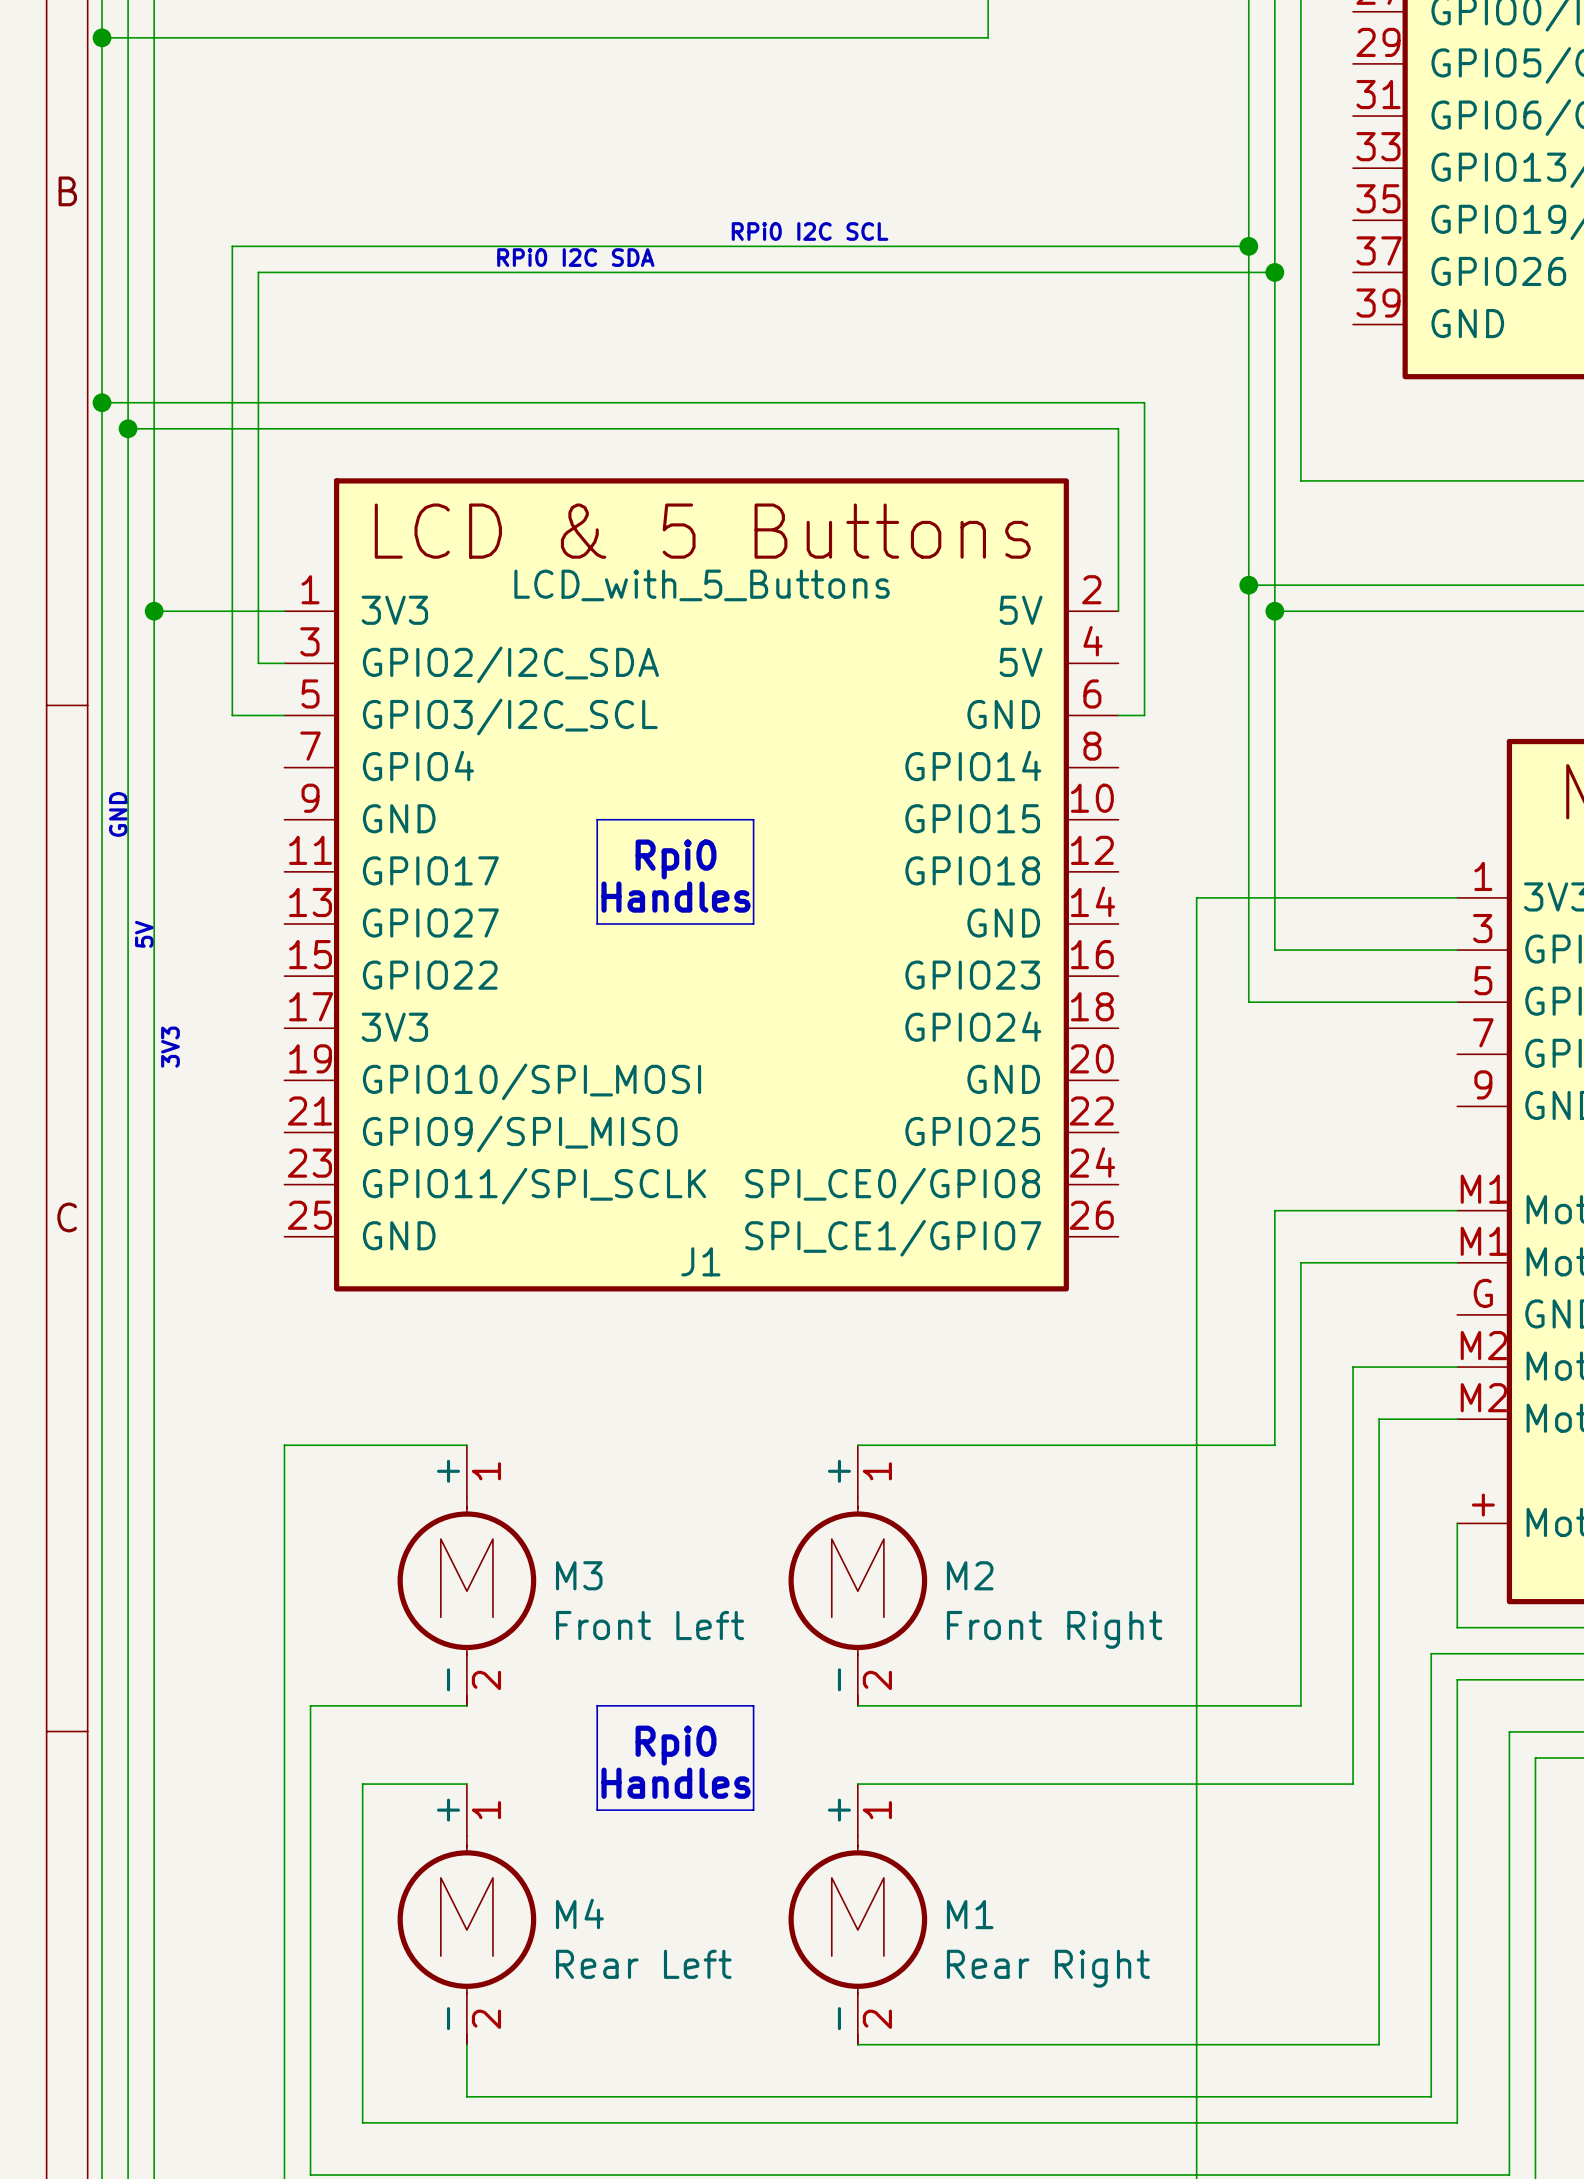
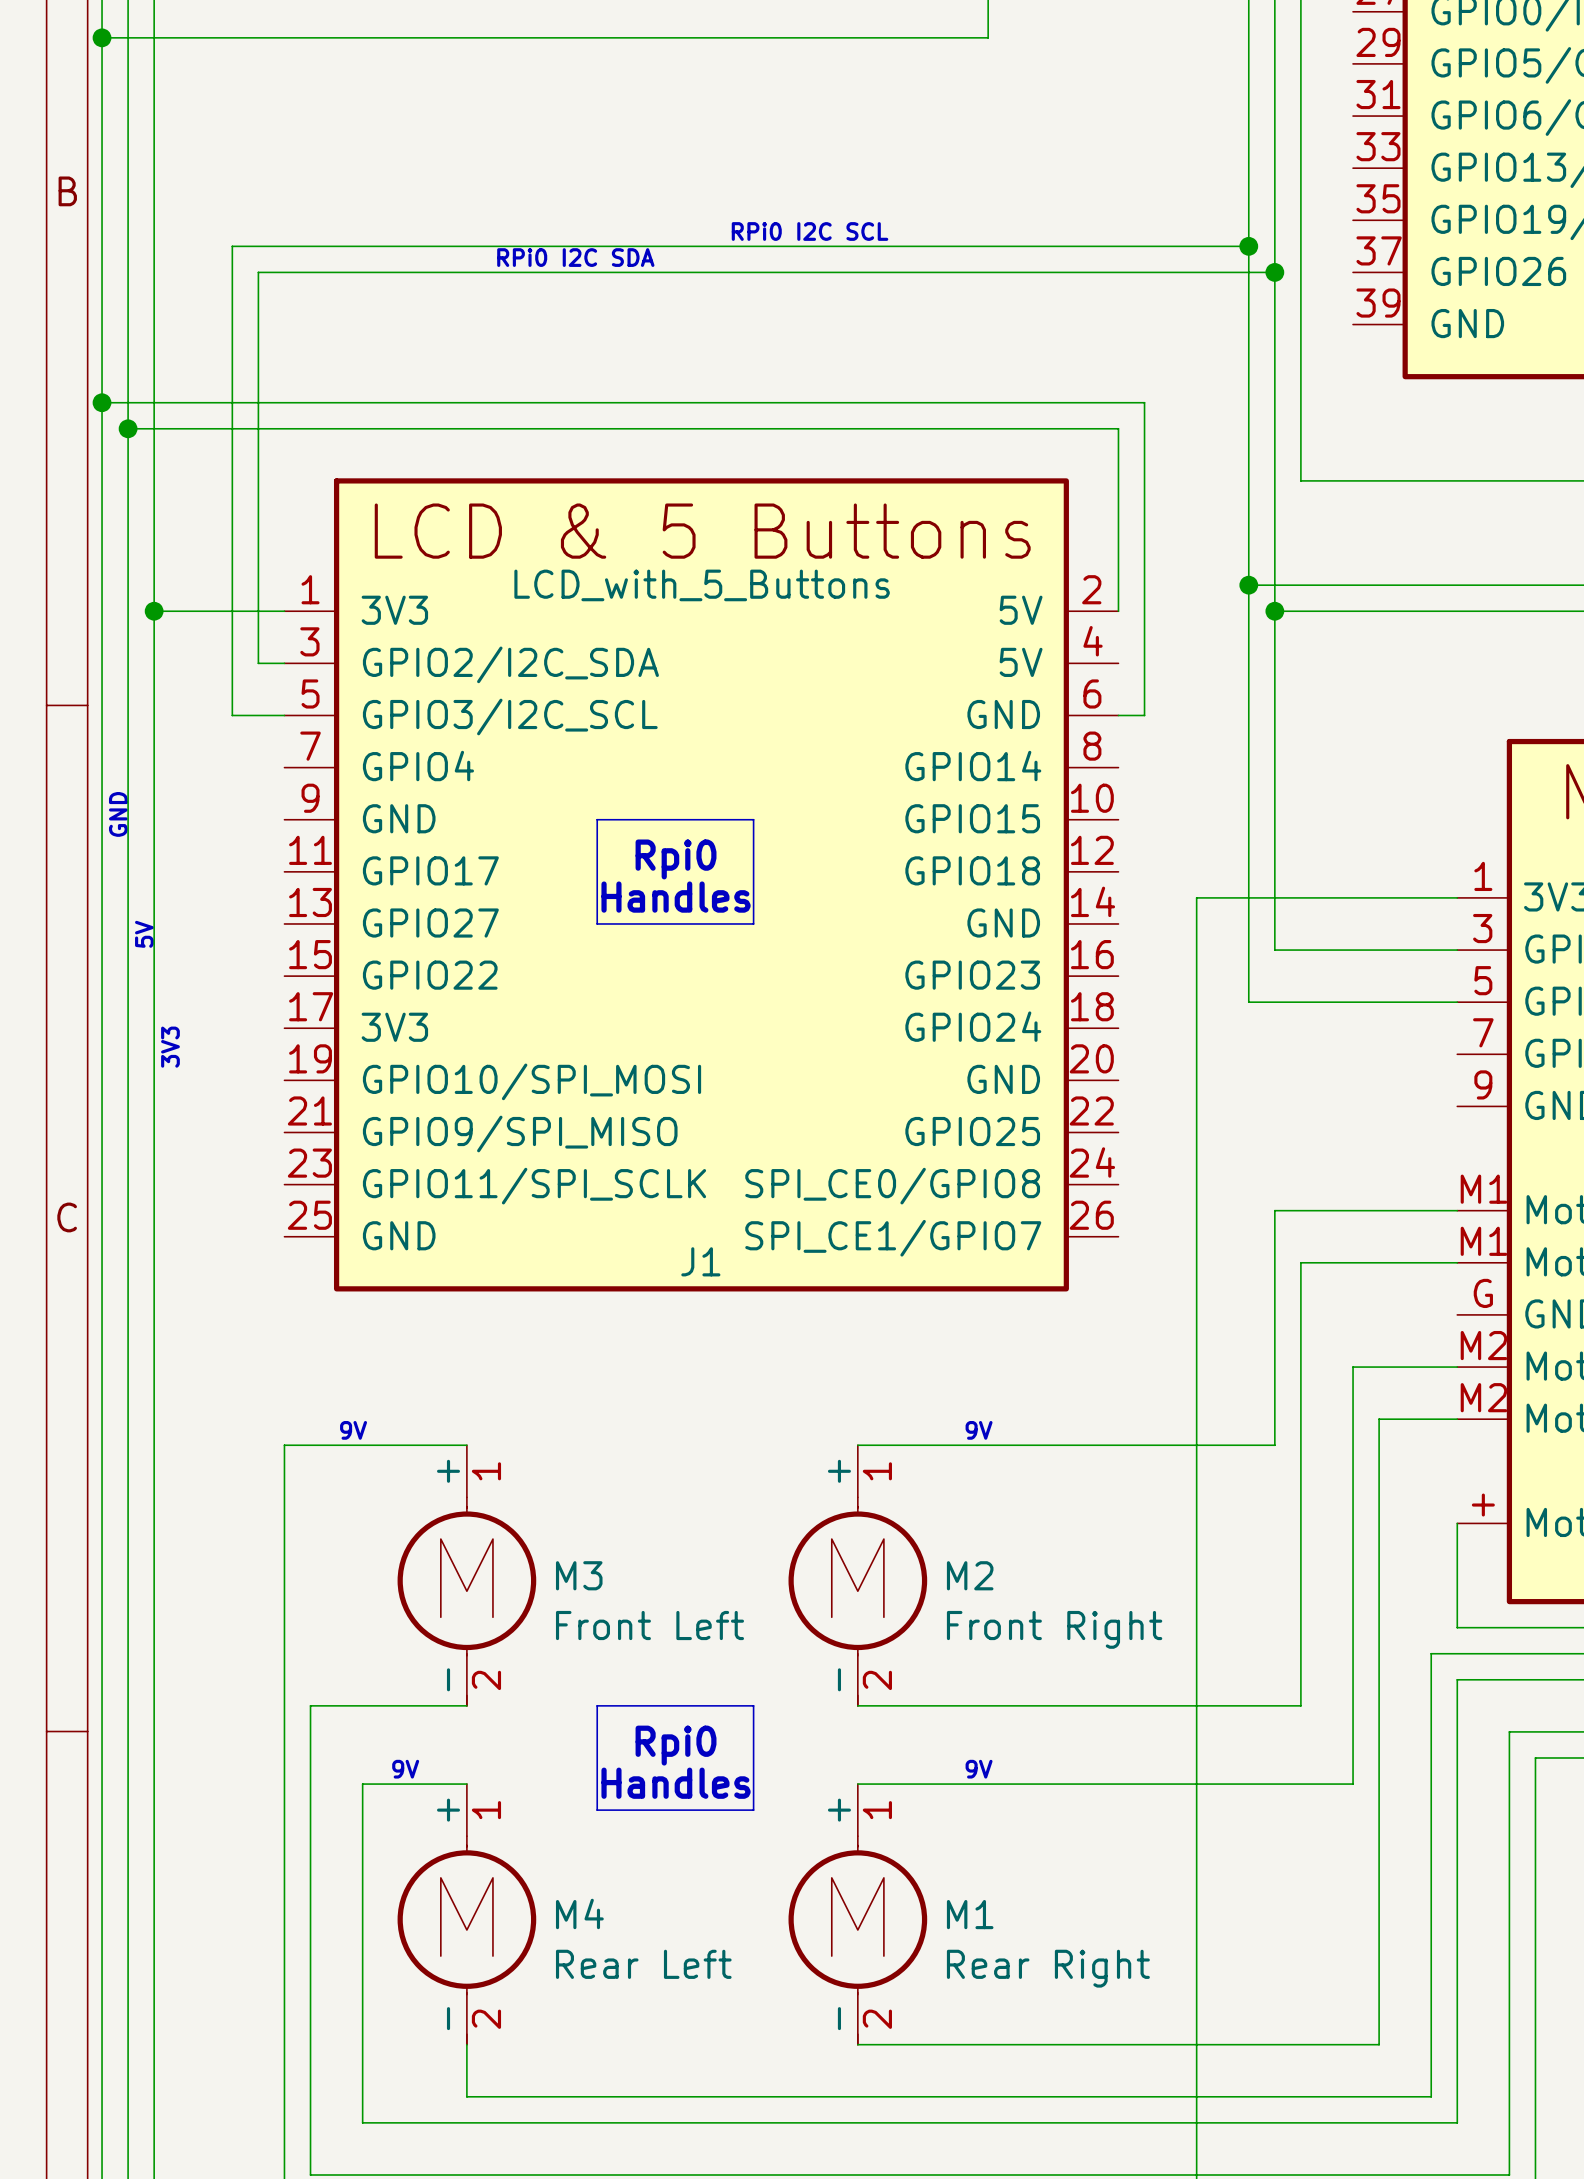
text: none -> 9V (353, 1430)
text: none -> 9V (979, 1430)
text: none -> 9V (405, 1769)
text: none -> 9V (979, 1769)

